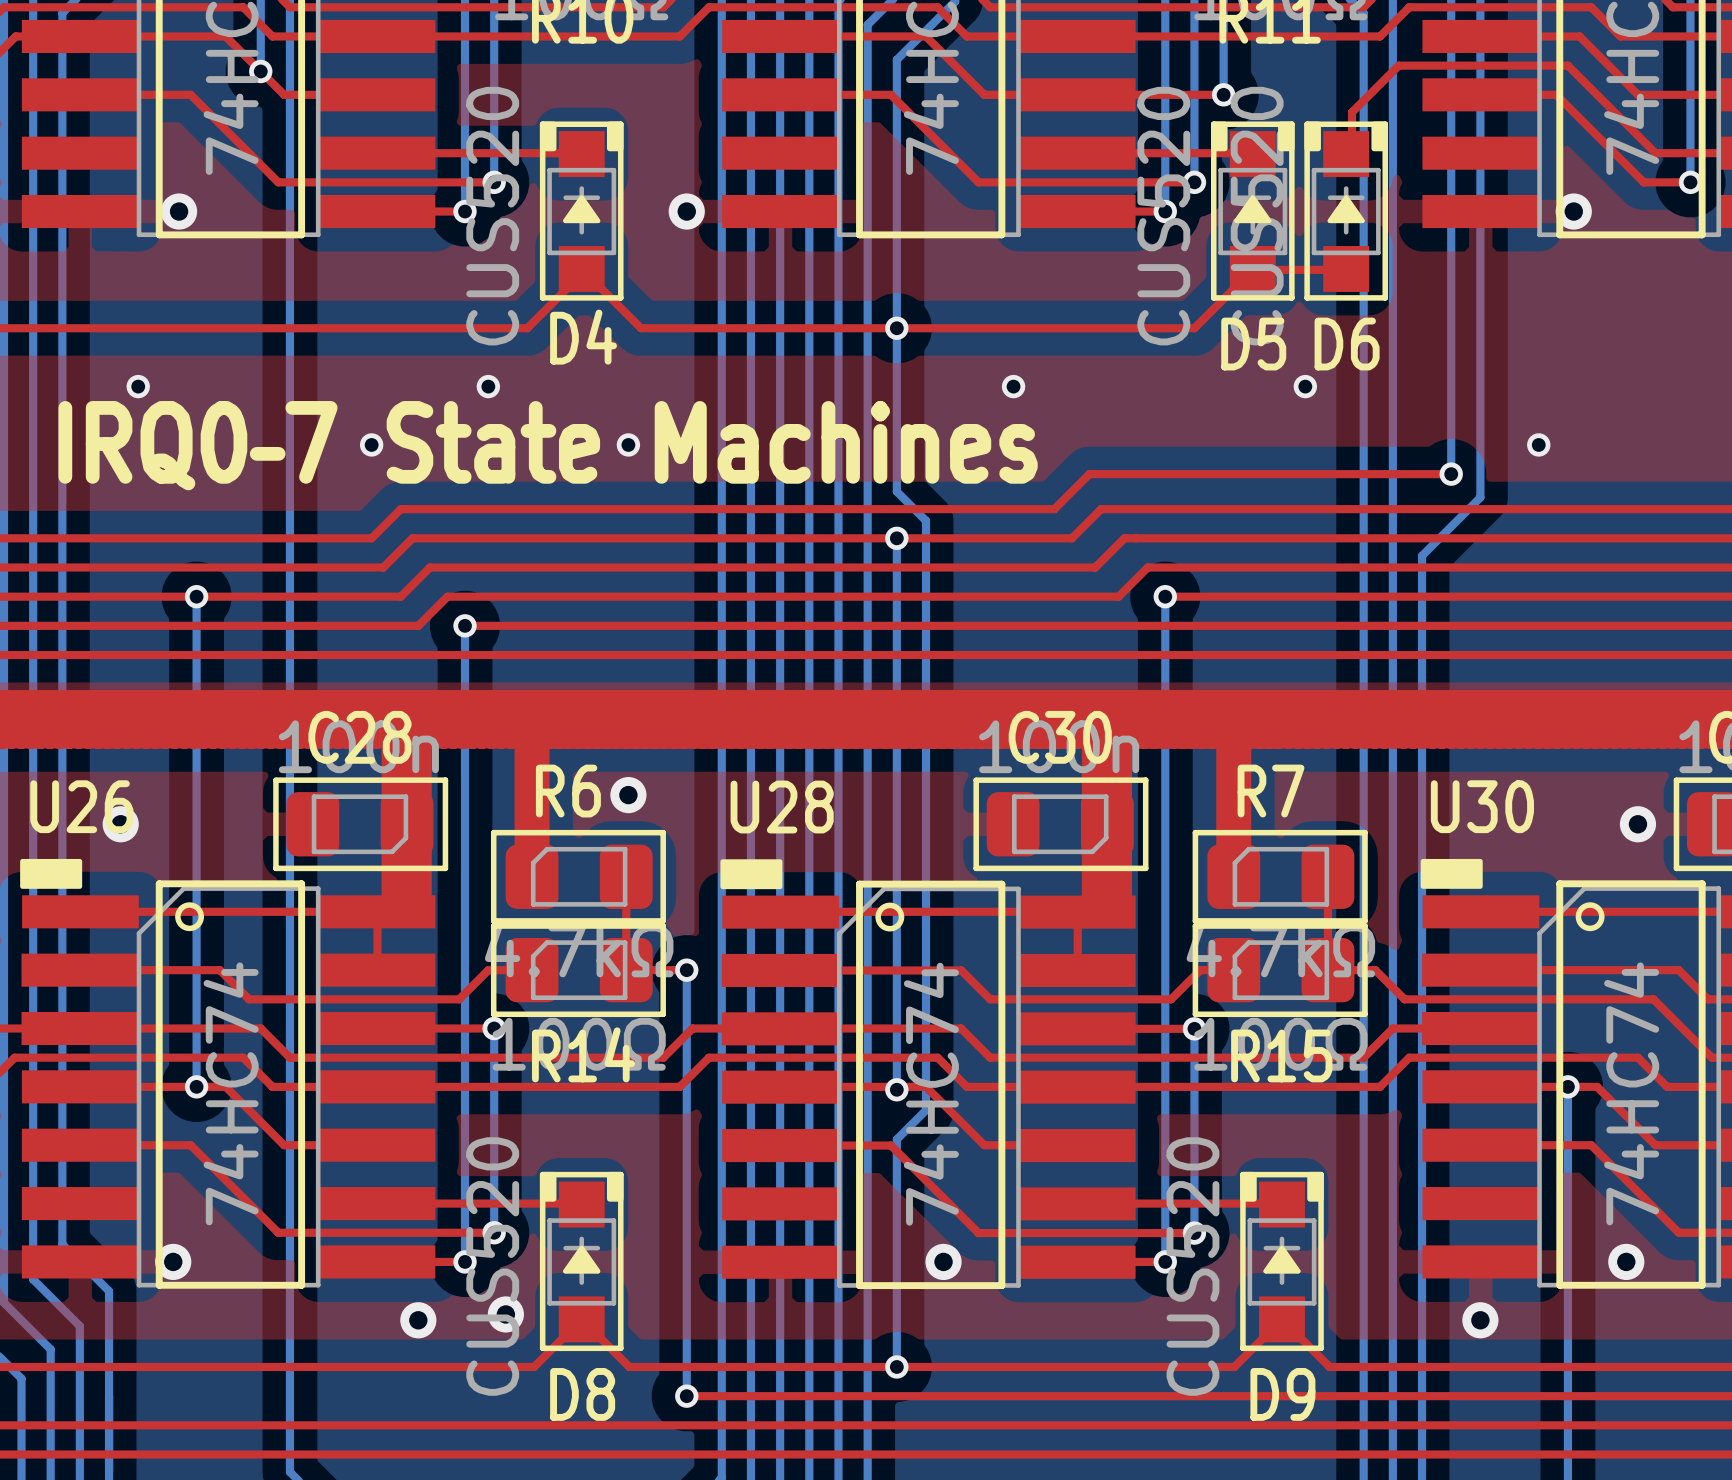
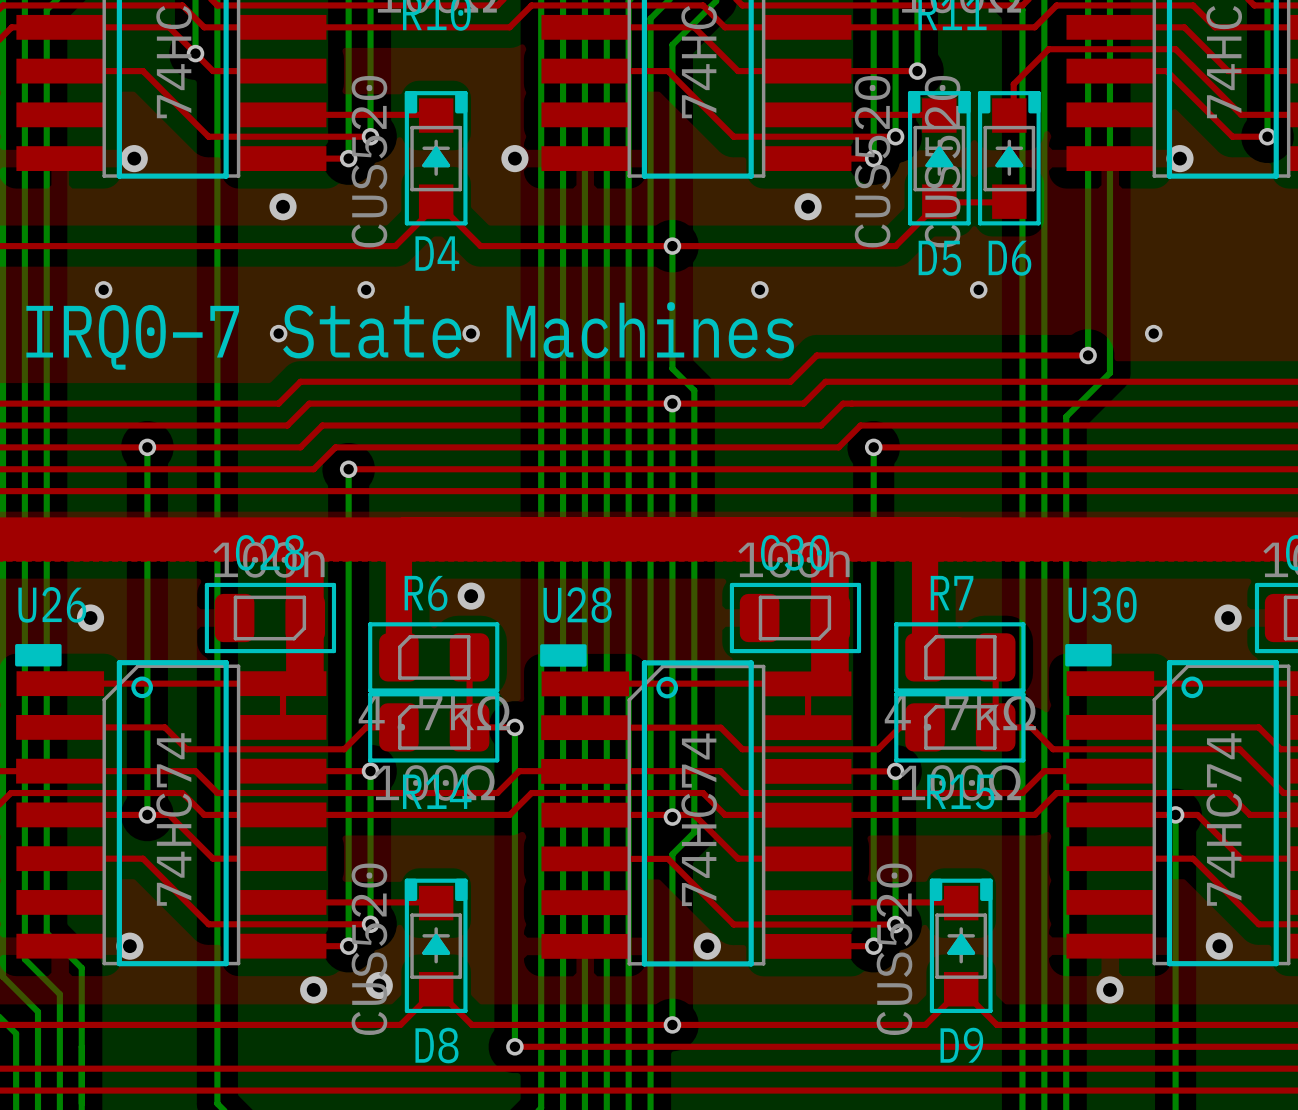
via: none -> (283, 206)
via: none -> (808, 206)

